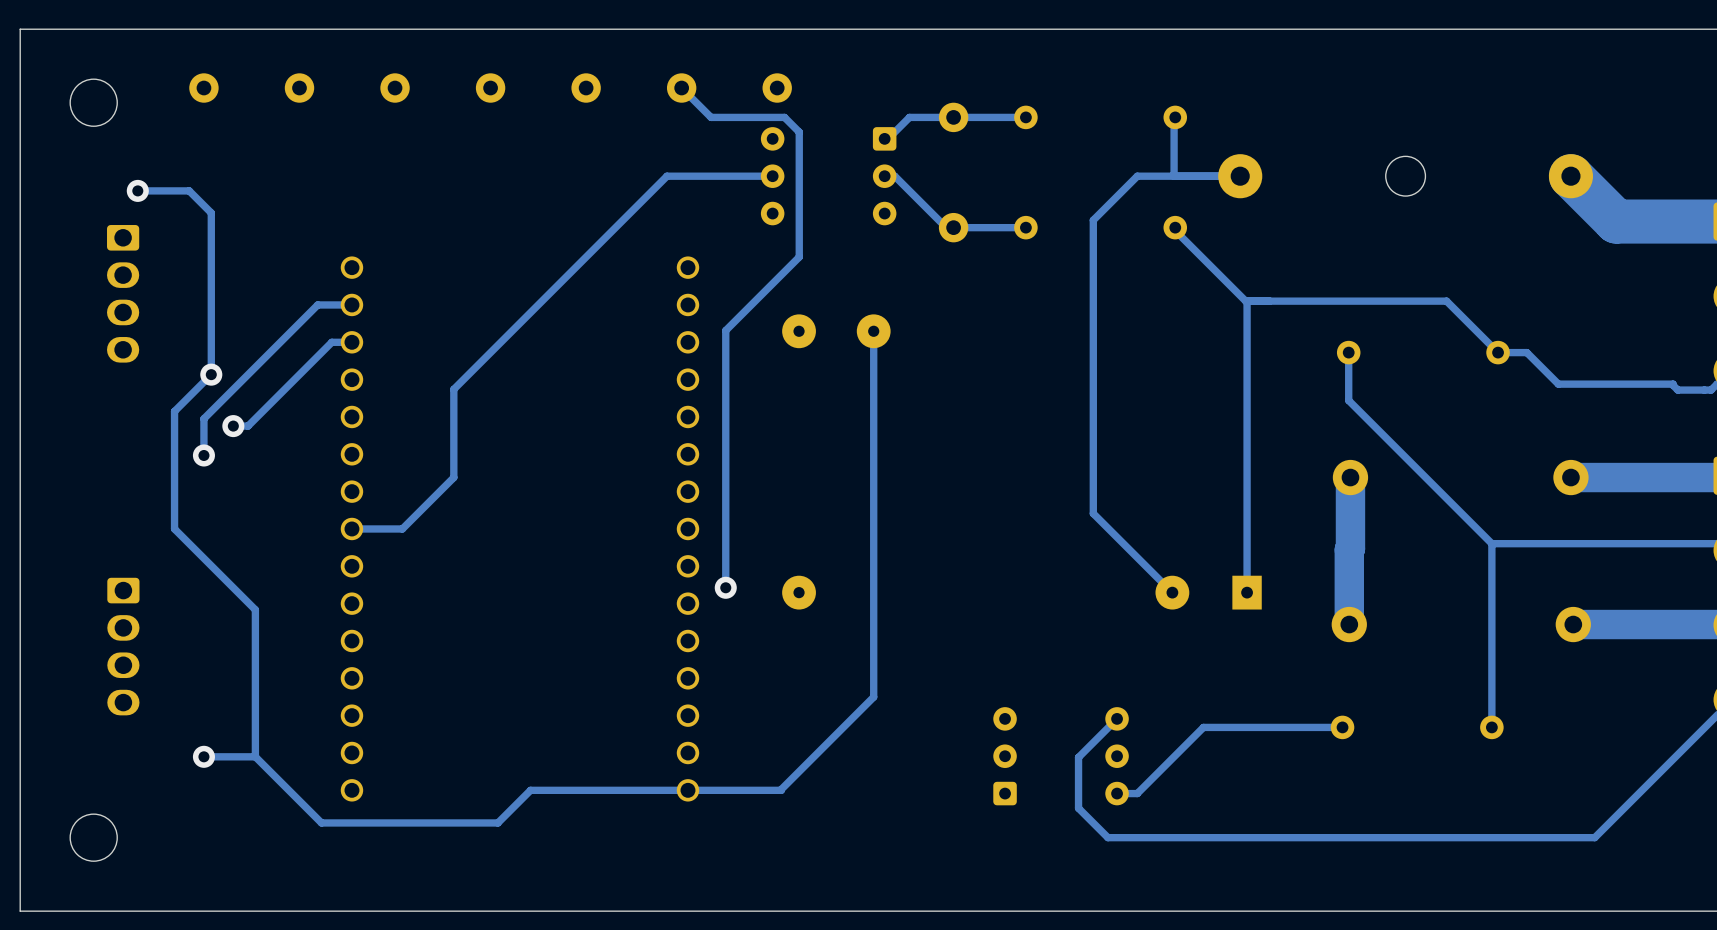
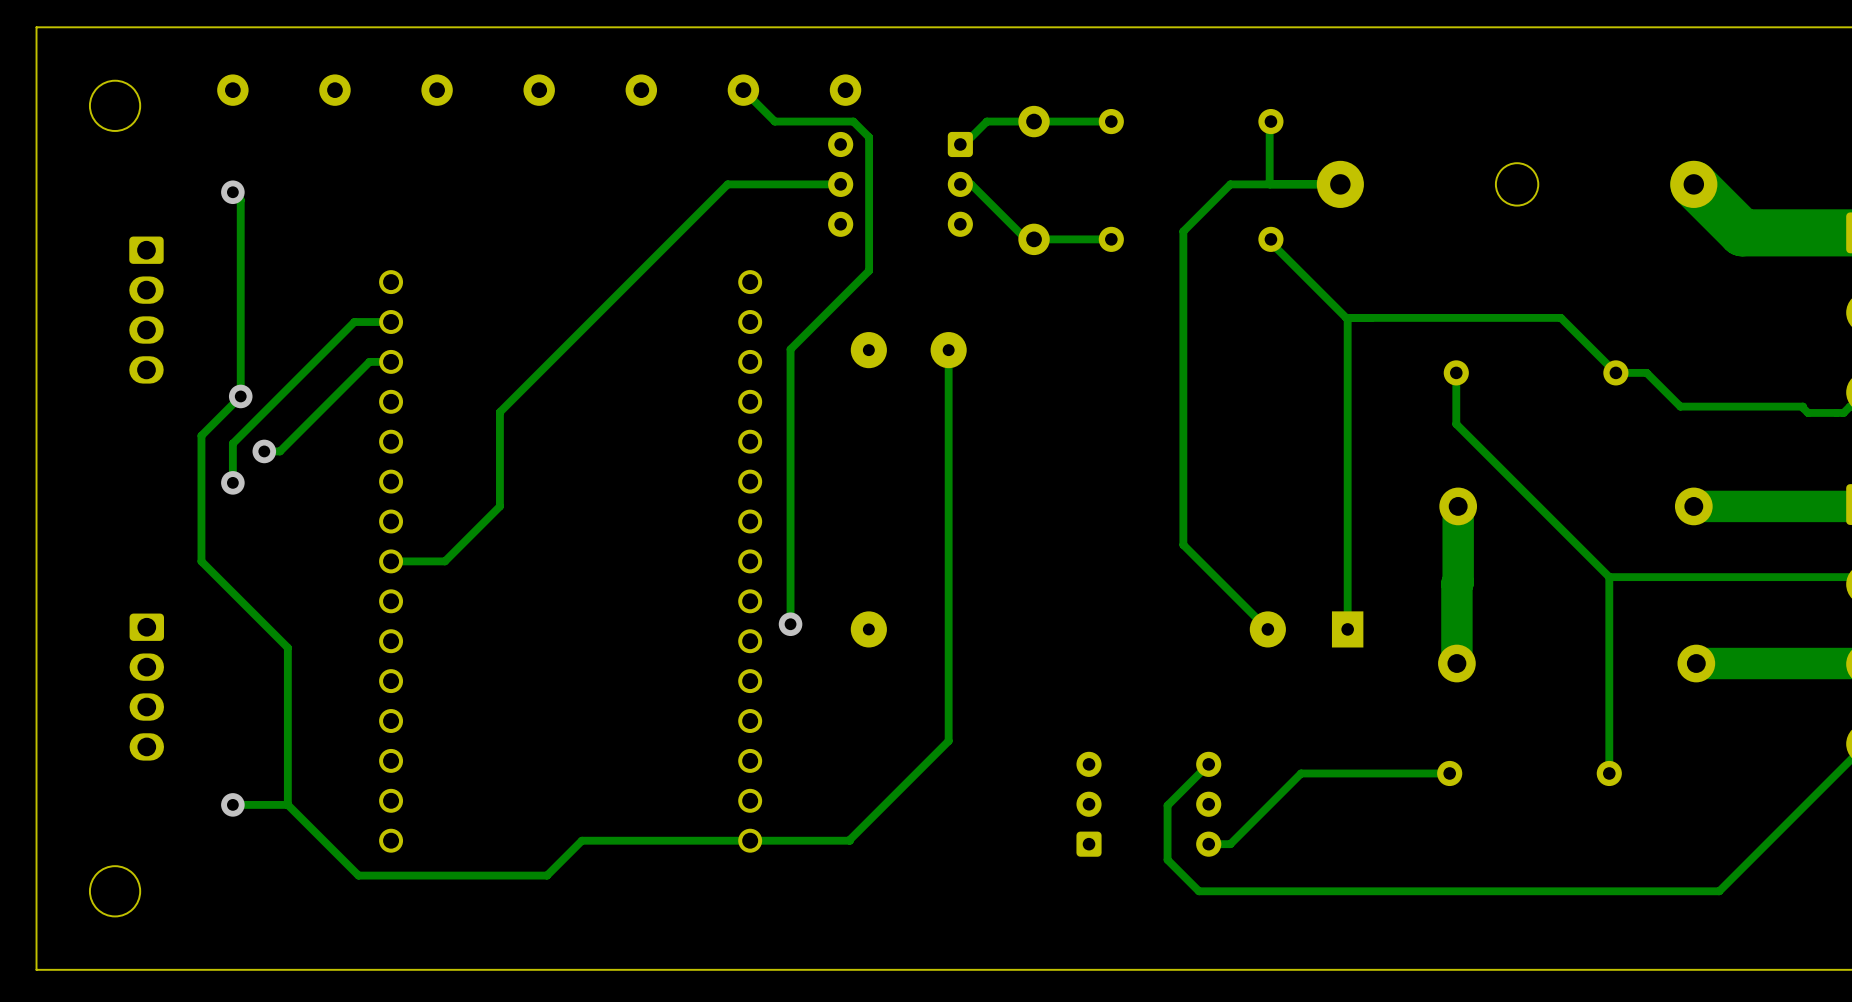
track: (137, 190) (189, 190) (211, 212) -> (232, 192) (240, 200) (240, 223)
via position: (137, 190) -> (232, 192)

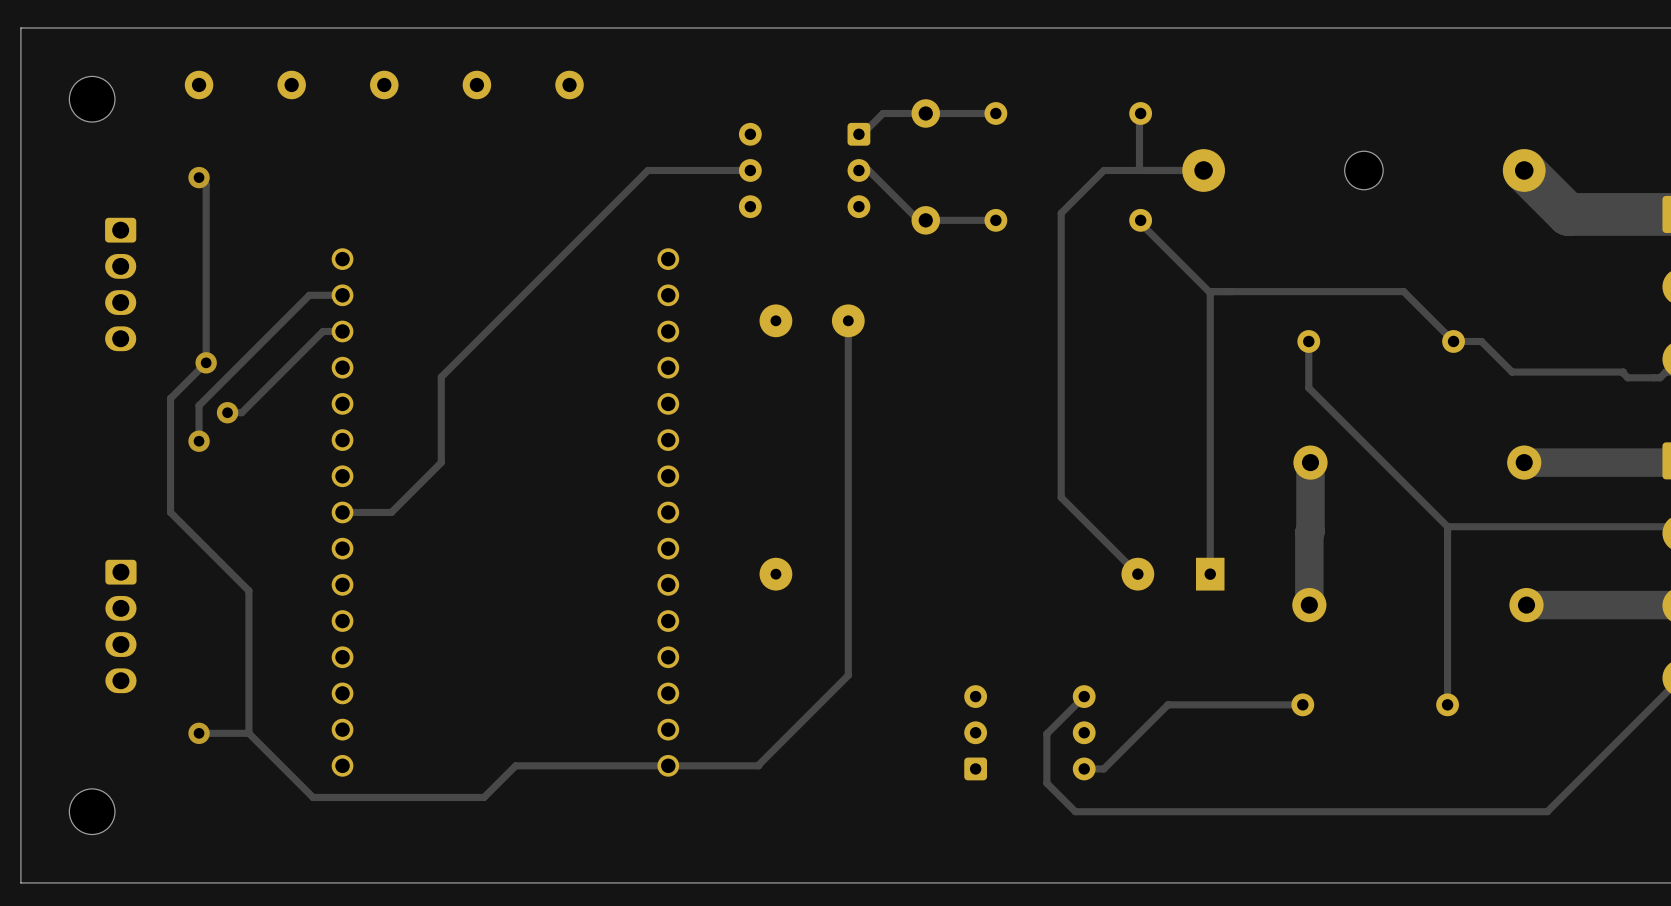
track: (743, 90) (774, 121) (853, 121) (869, 137) (869, 270) (790, 349) (790, 624) -> none
part: (743, 90) -> none
part: (845, 90) -> none
via: (790, 624) -> none

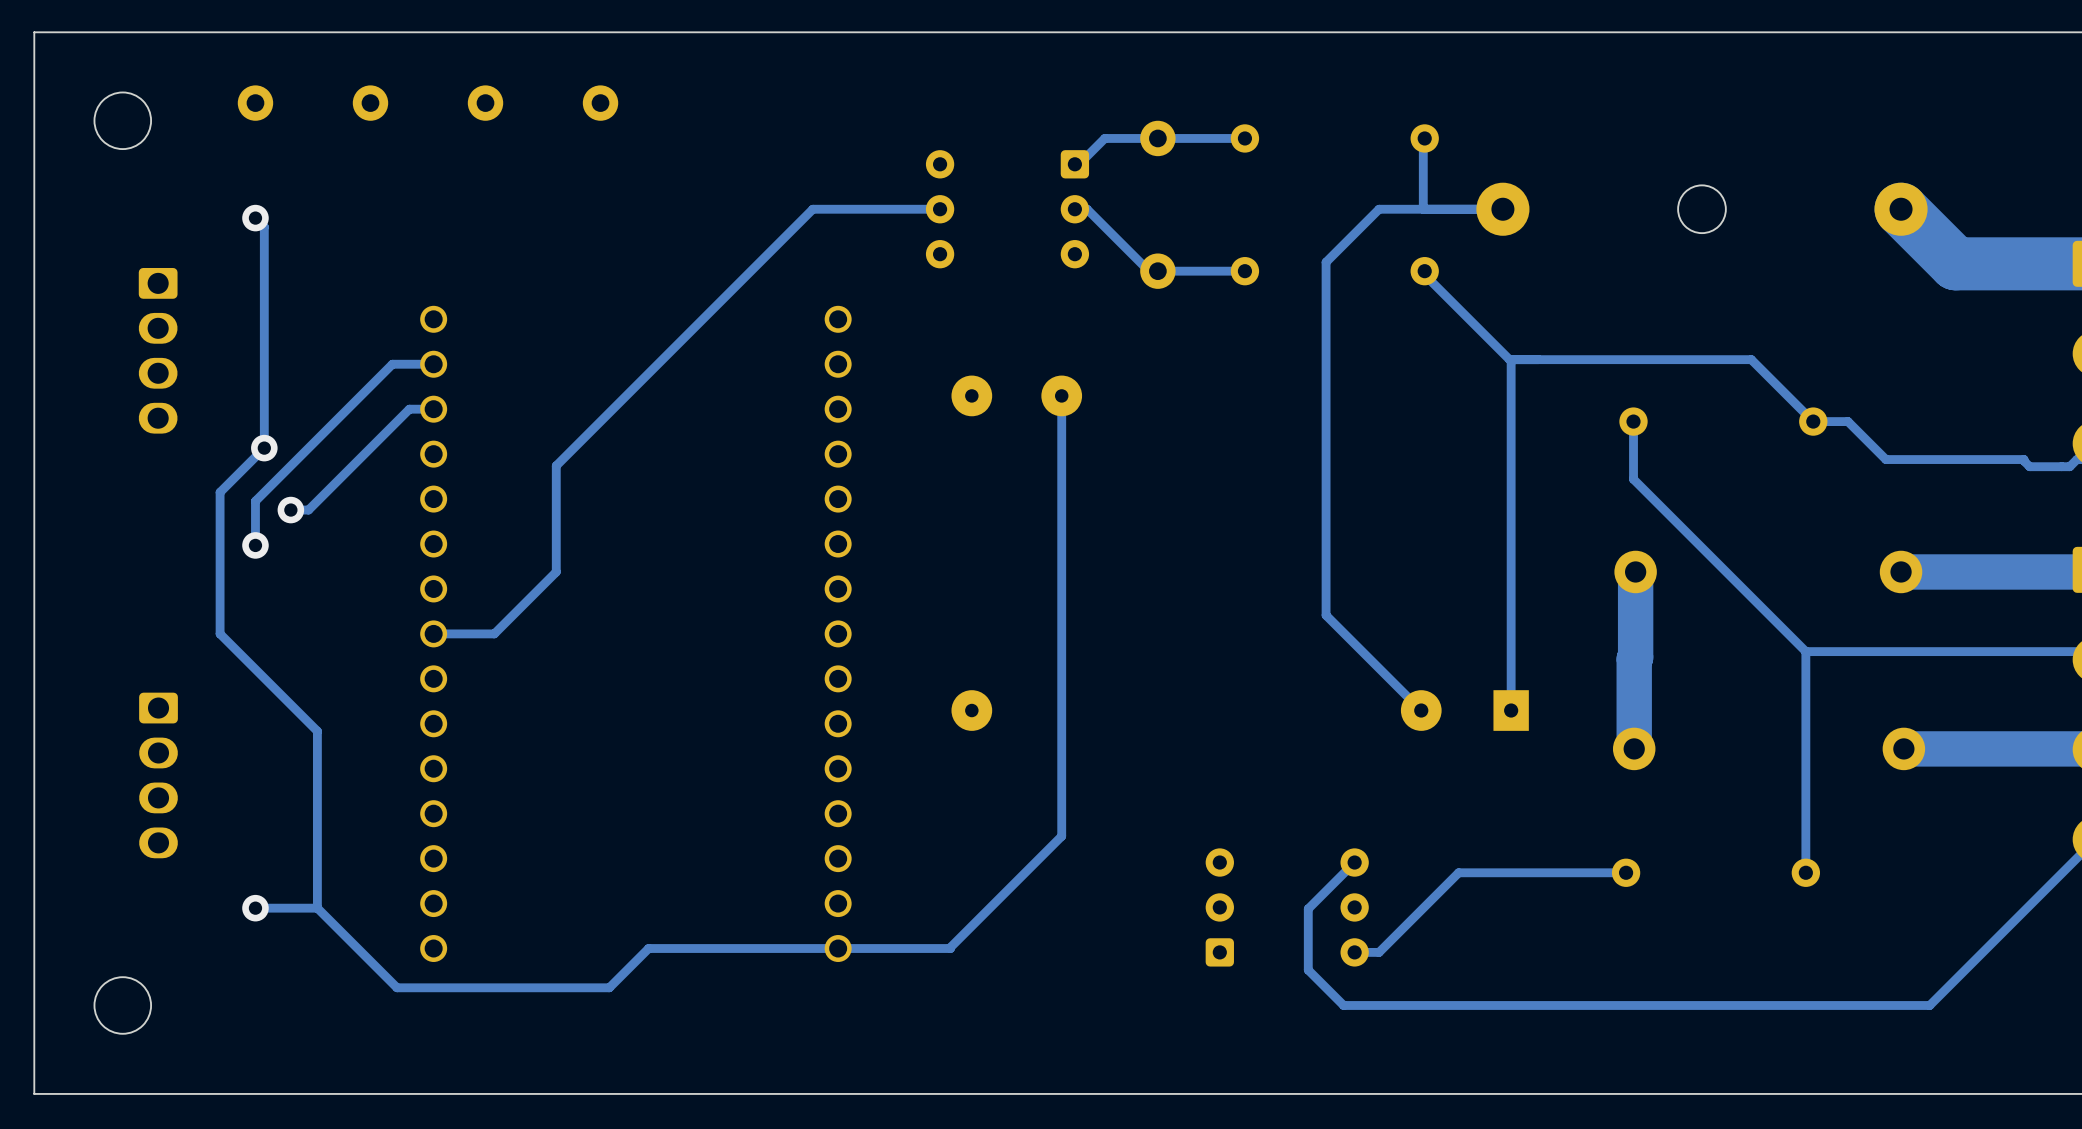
part: (569, 84) -> none

